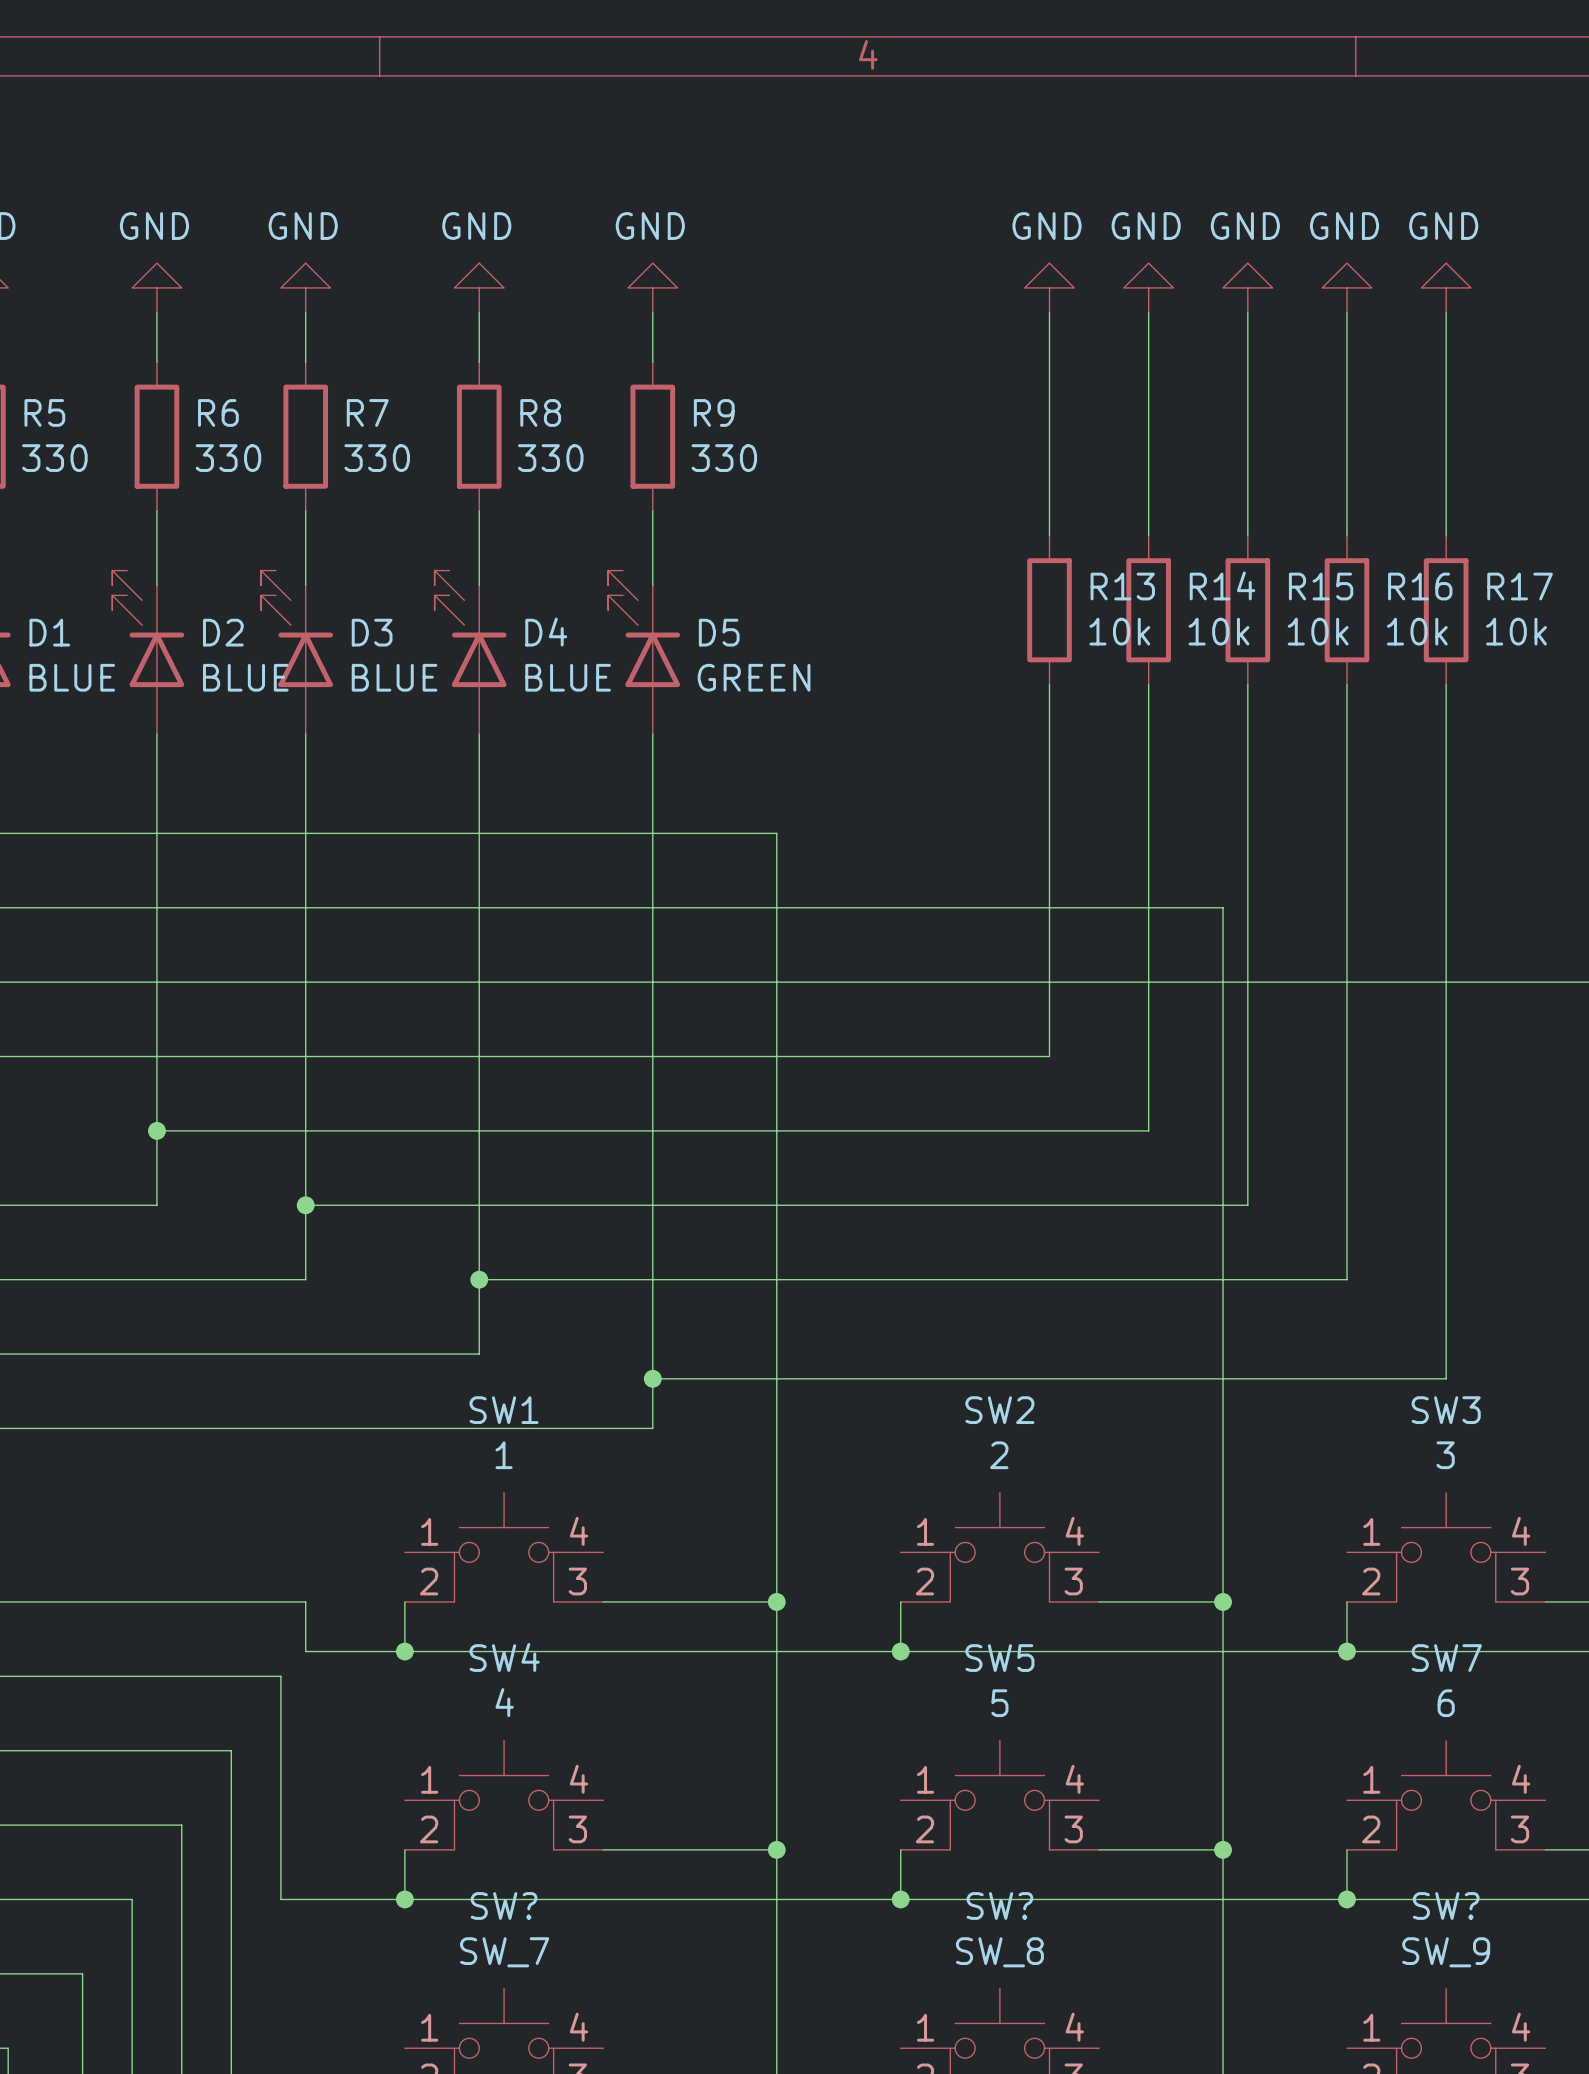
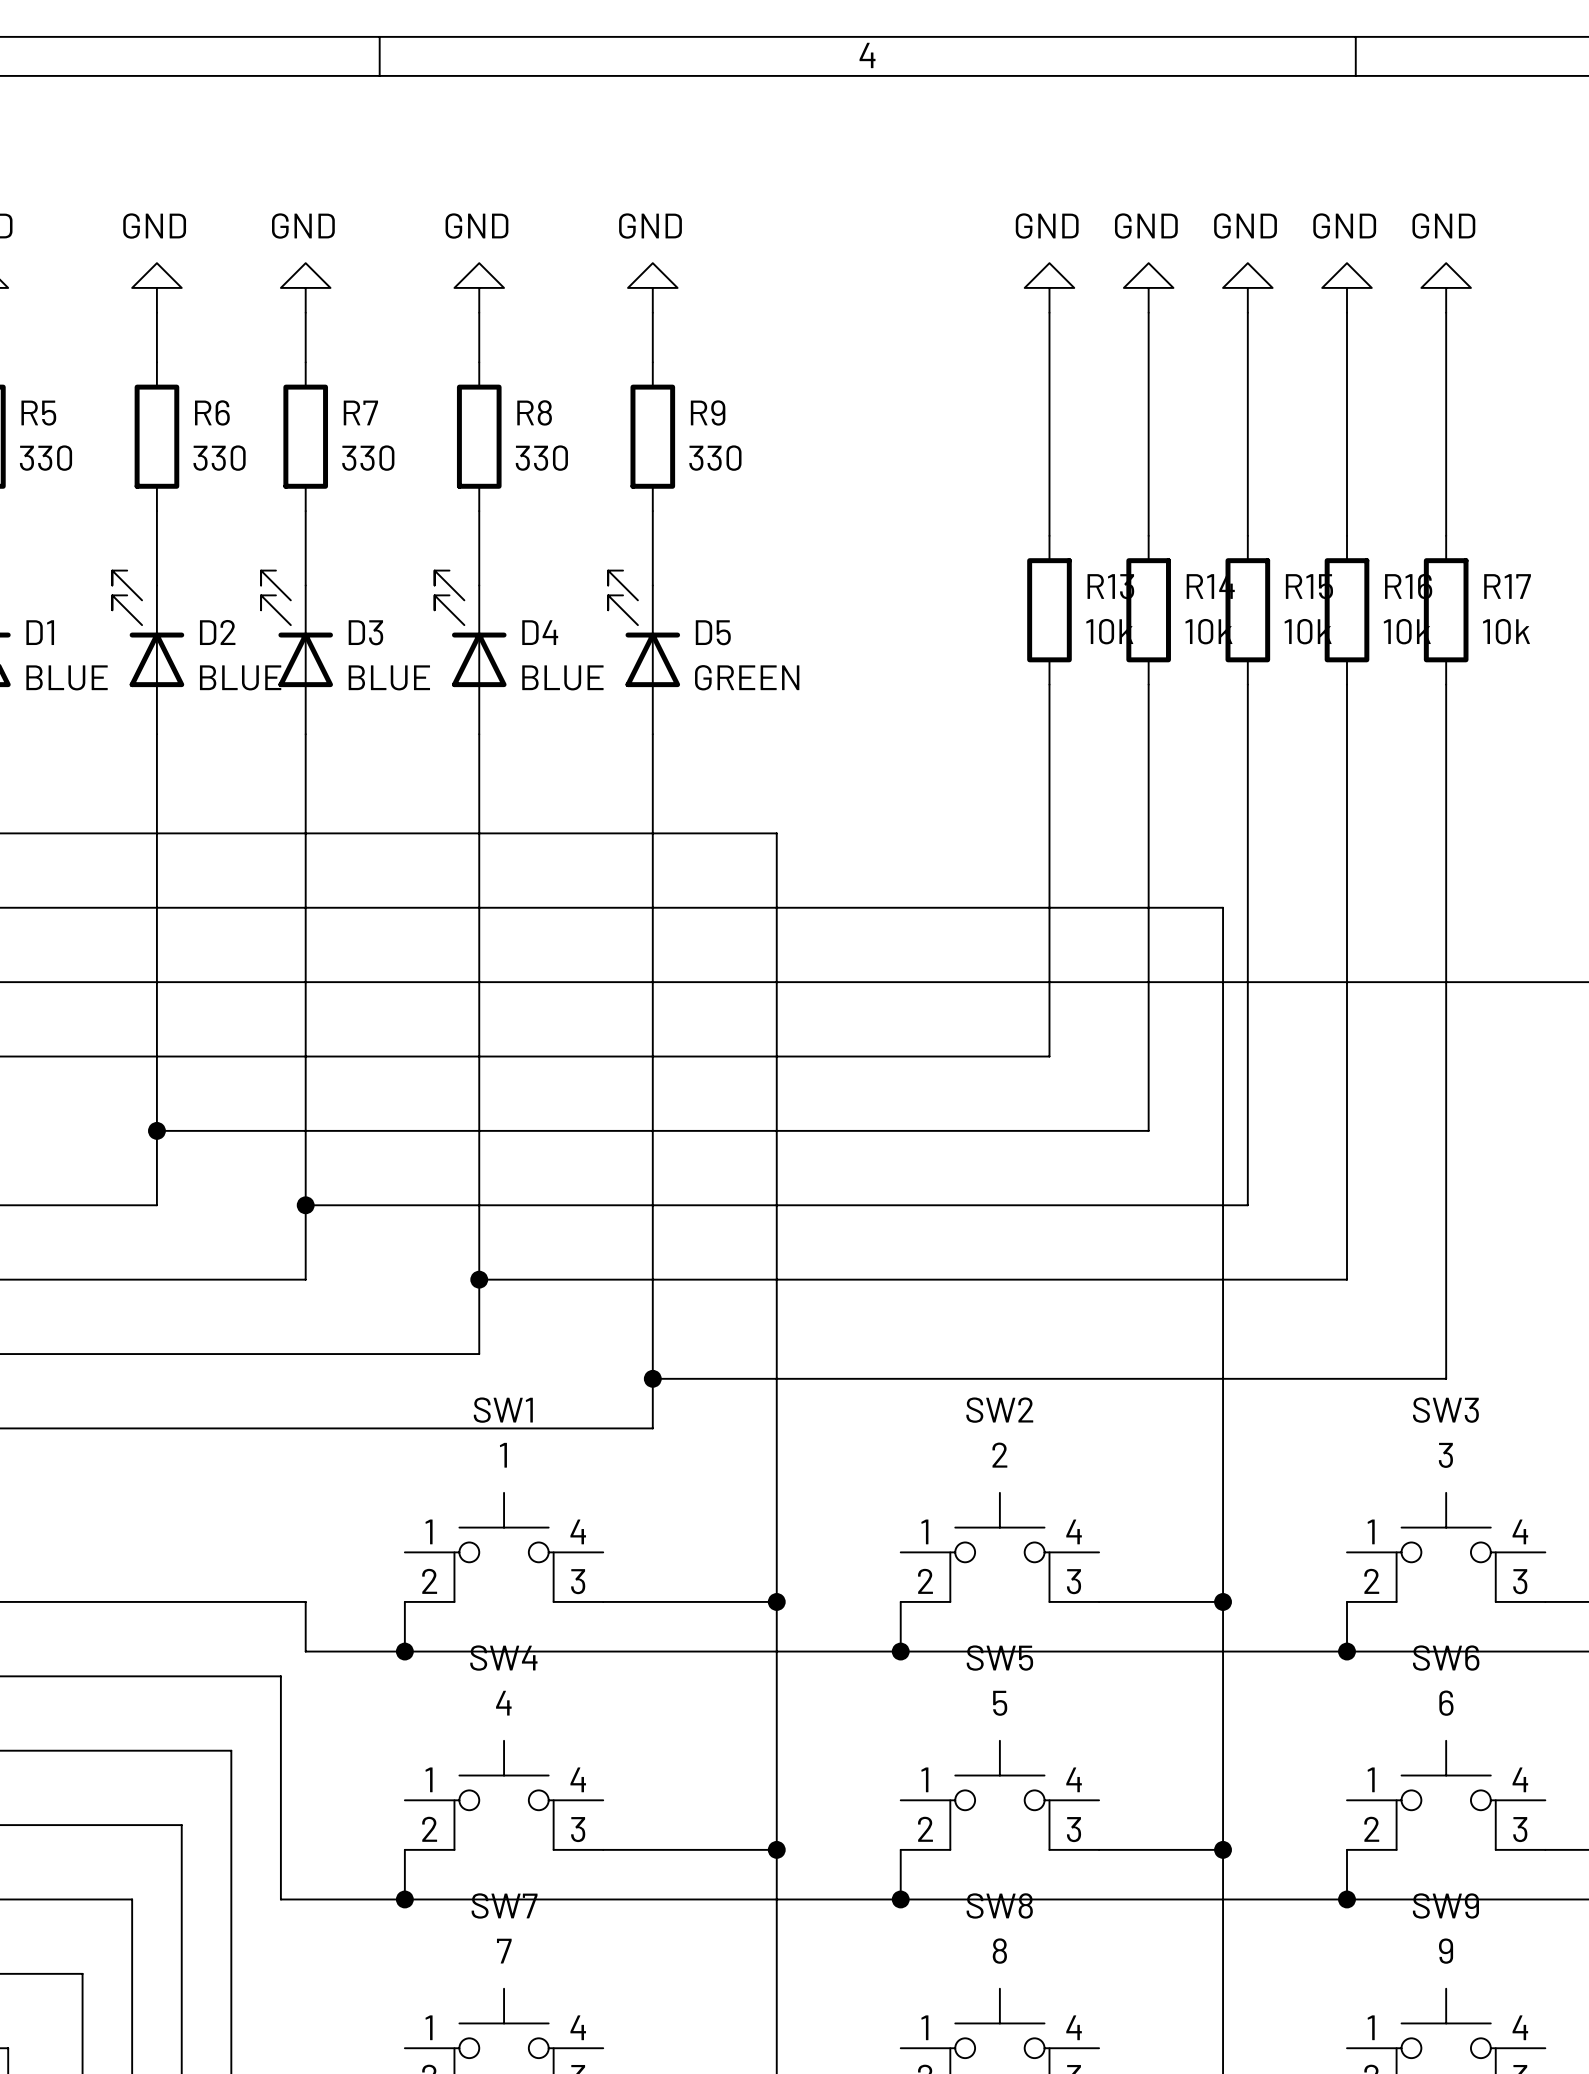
SW7 name: SW7 (1446, 1658) -> SW6 (1446, 1658)
SW? name: SW? (504, 1905) -> SW7 (504, 1905)
SW? name: SW? (999, 1905) -> SW8 (999, 1905)
SW? name: SW? (1446, 1905) -> SW9 (1445, 1905)
SW? value: SW_7 (504, 1952) -> 7 (504, 1951)
SW? value: SW_8 (999, 1952) -> 8 (999, 1951)
SW? value: SW_9 (1446, 1952) -> 9 (1446, 1951)

